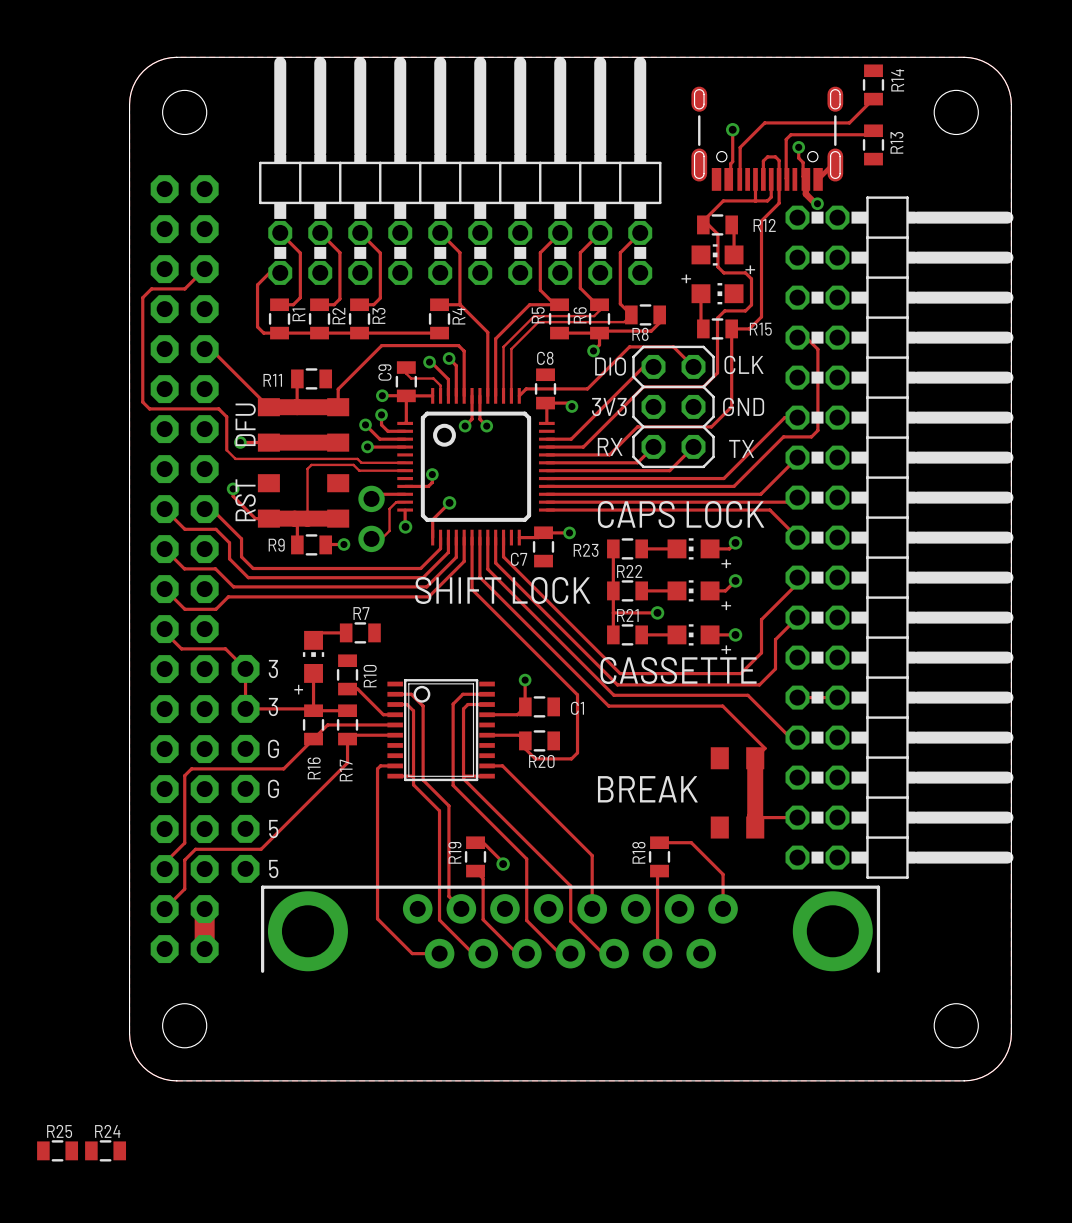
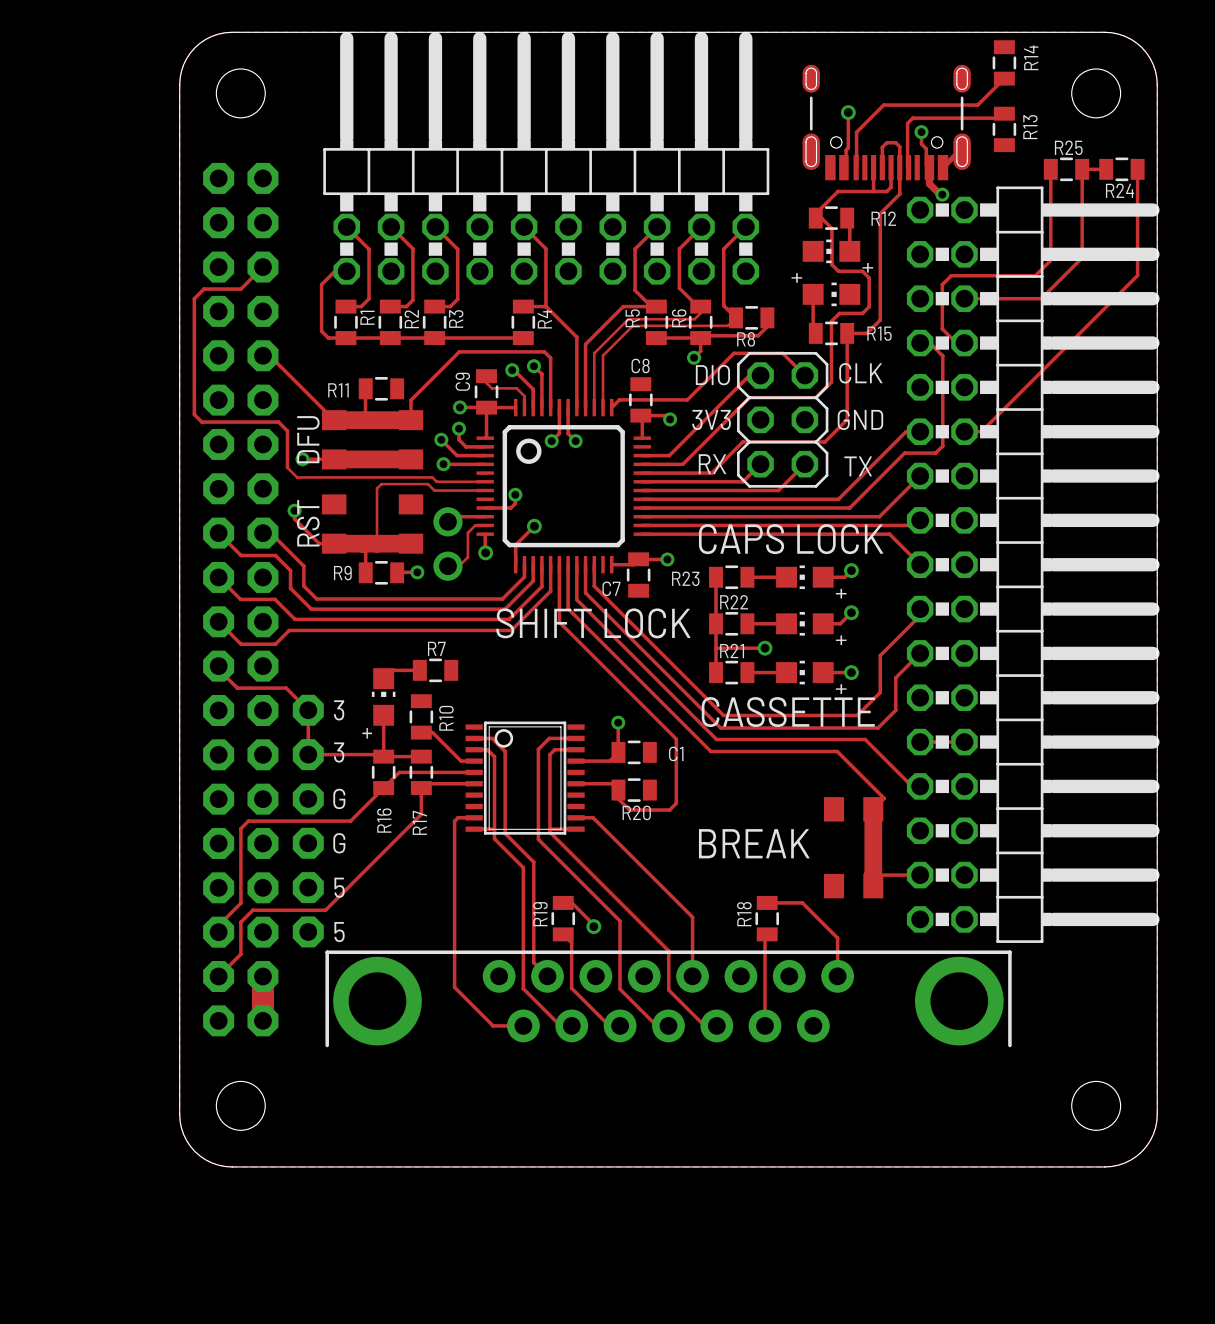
track: none -> (1050, 169) (1050, 260) (1035, 275) (951, 275) (942, 284) (942, 328) (956, 343) (964, 343)
track: none -> (1106, 169) (1082, 169) (1082, 257) (1041, 298) (964, 298)
track: none -> (1137, 169) (1137, 275) (981, 431) (964, 431)
R24 name position: R24 (107, 1131) -> R24 (1120, 190)
R25 position: (57, 1150) -> (1066, 169)
R24 position: (105, 1150) -> (1121, 169)

